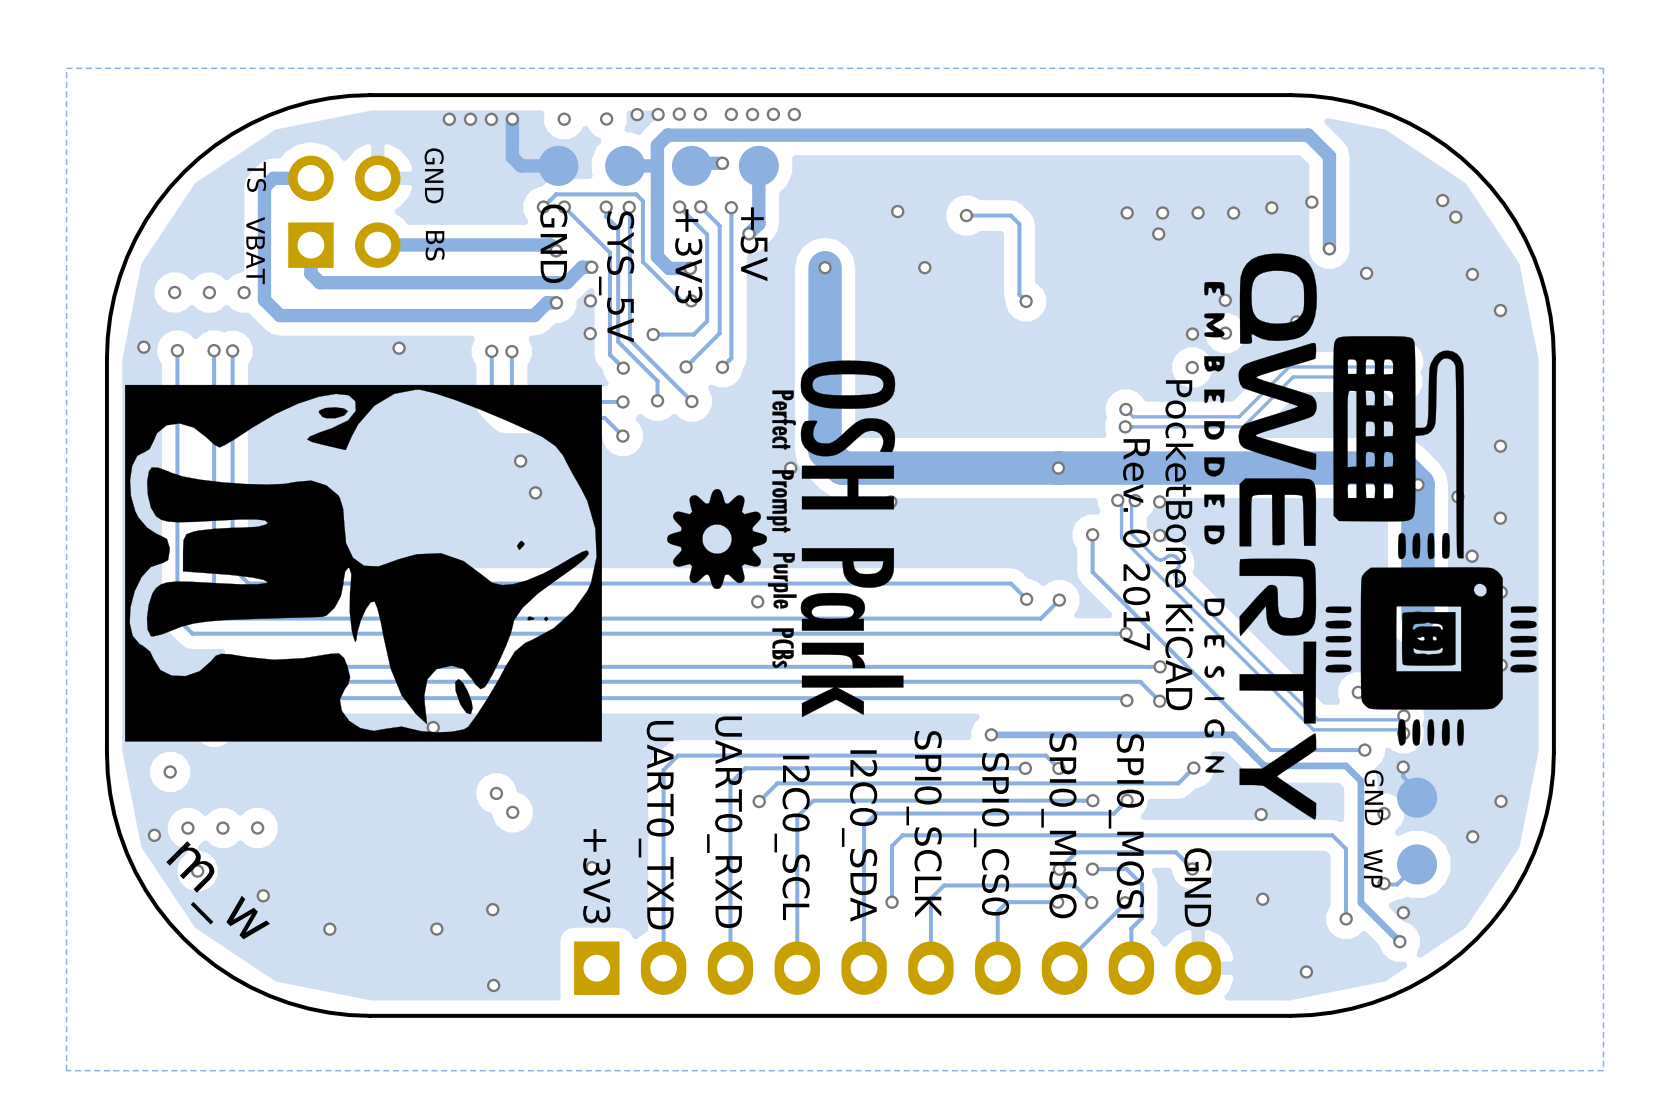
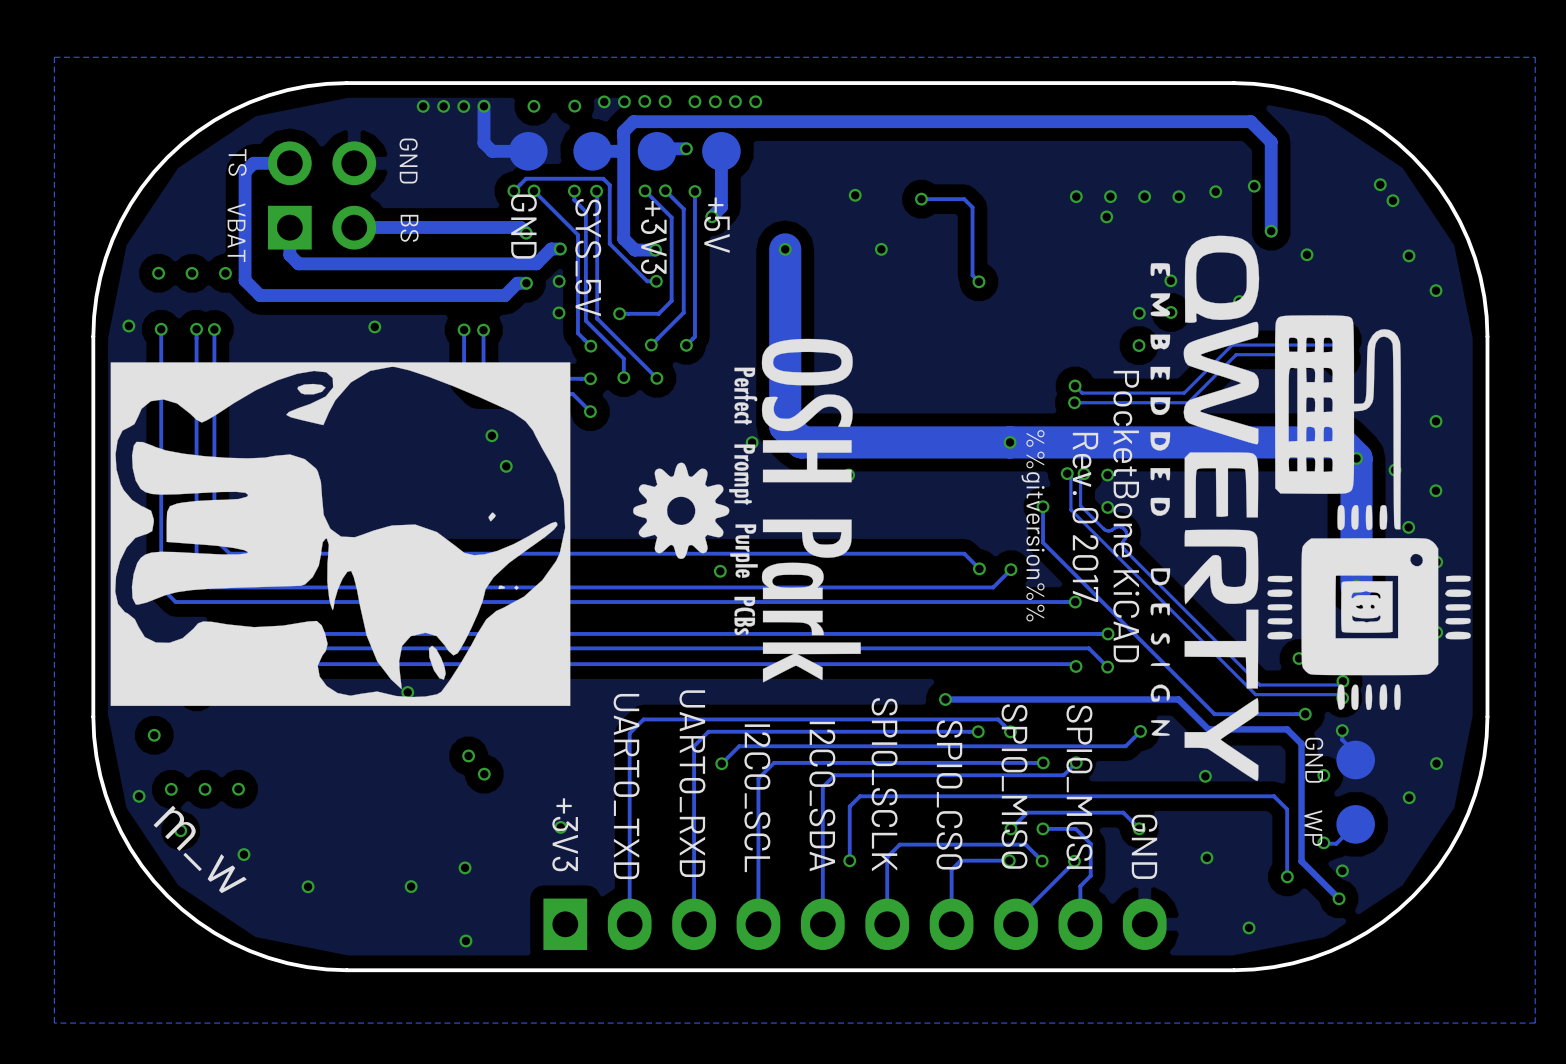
text: none -> %%gitversion%% (1033, 525)

